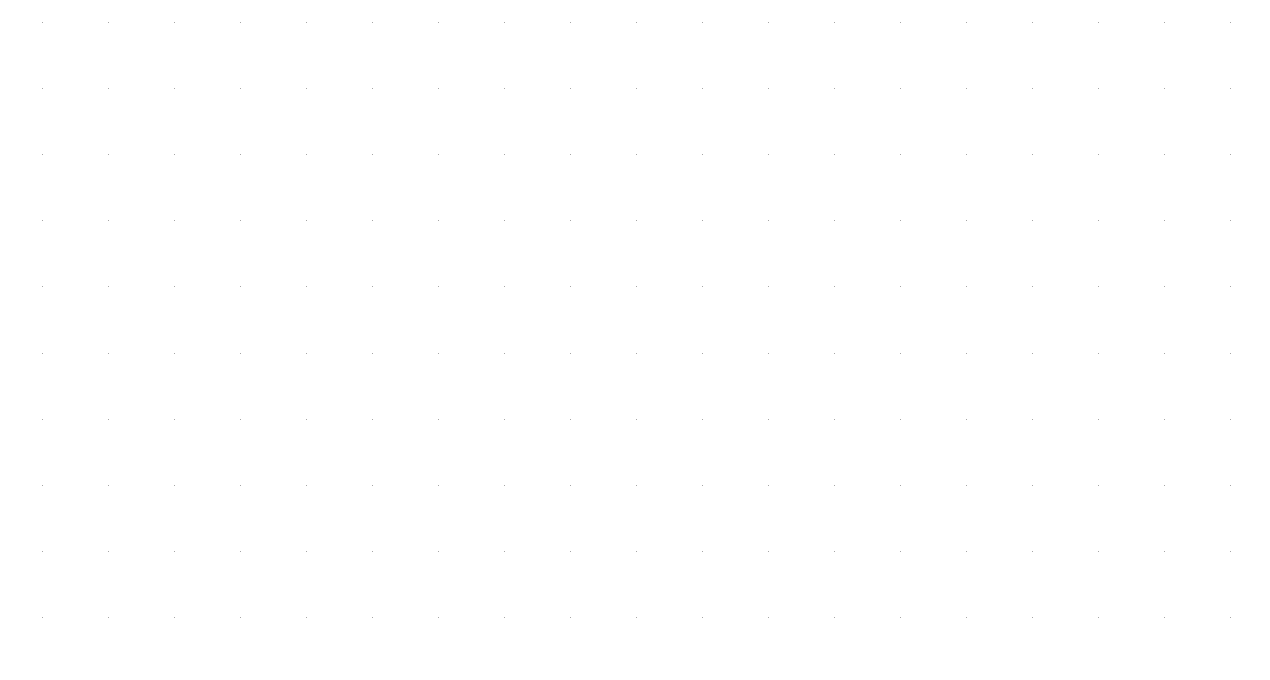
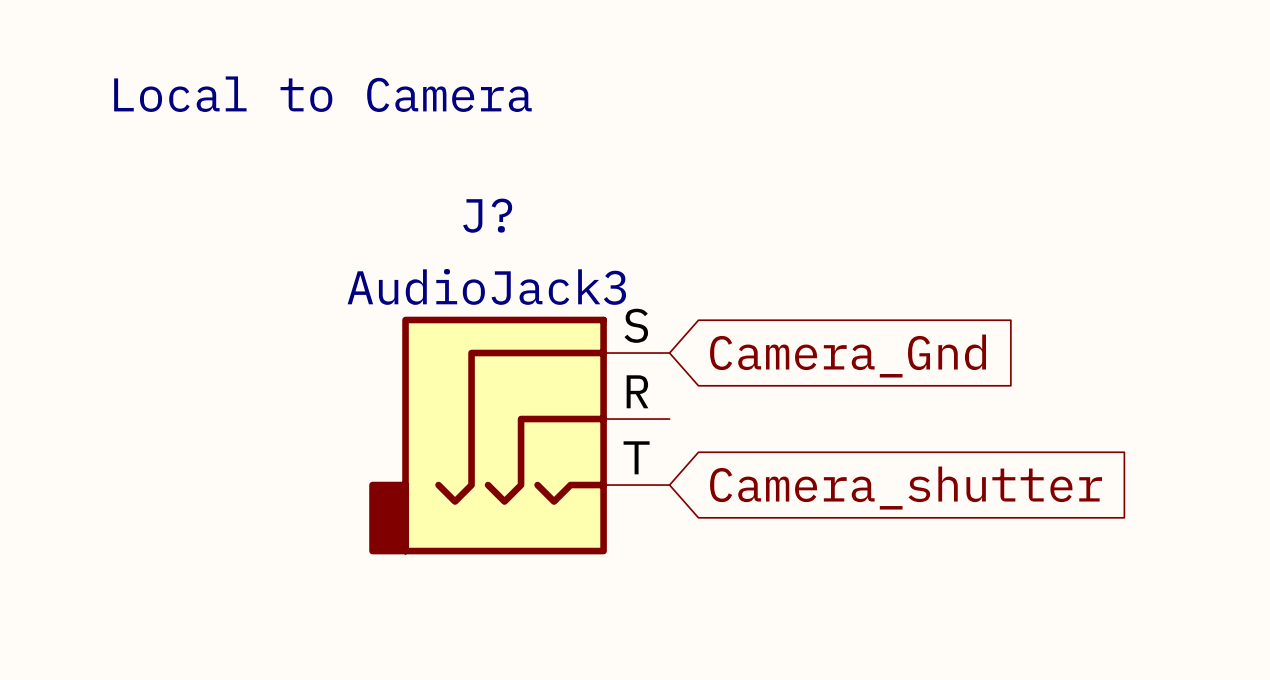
text: none -> Local to Camera (322, 94)
global label: none -> Camera_Gnd (848, 356)
J?: none -> AudioJack3 (519, 435)
global label: none -> Camera_shutter (906, 488)

